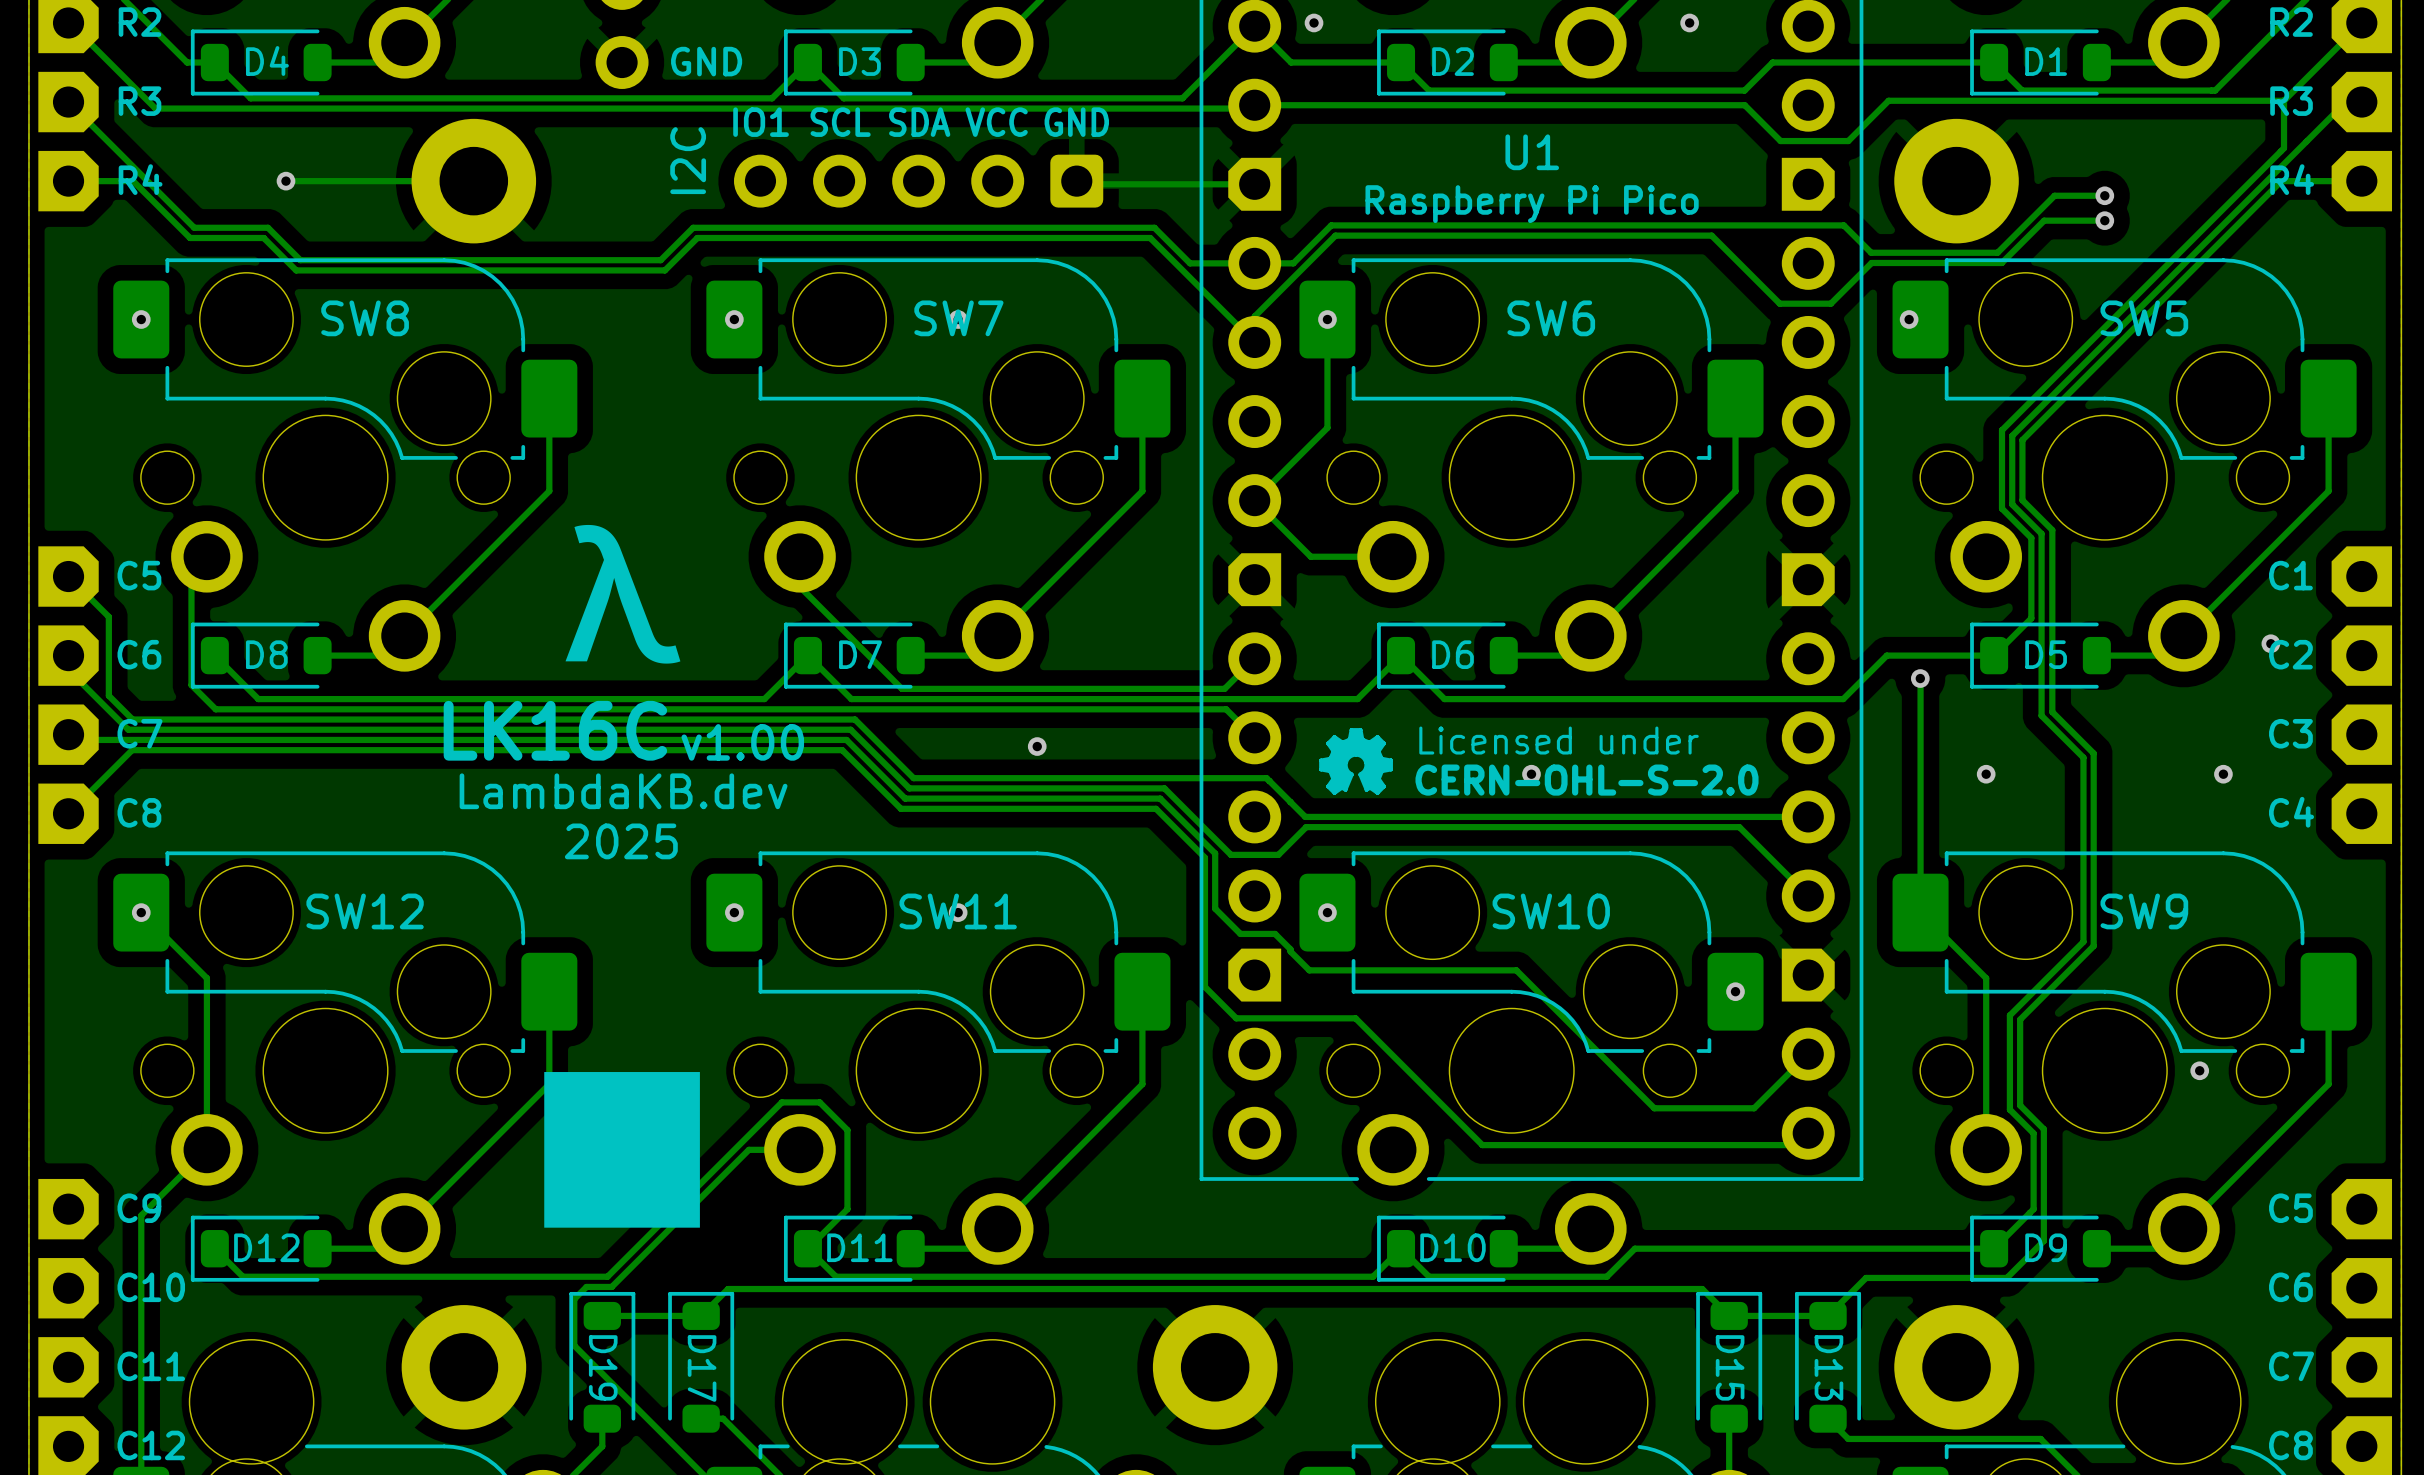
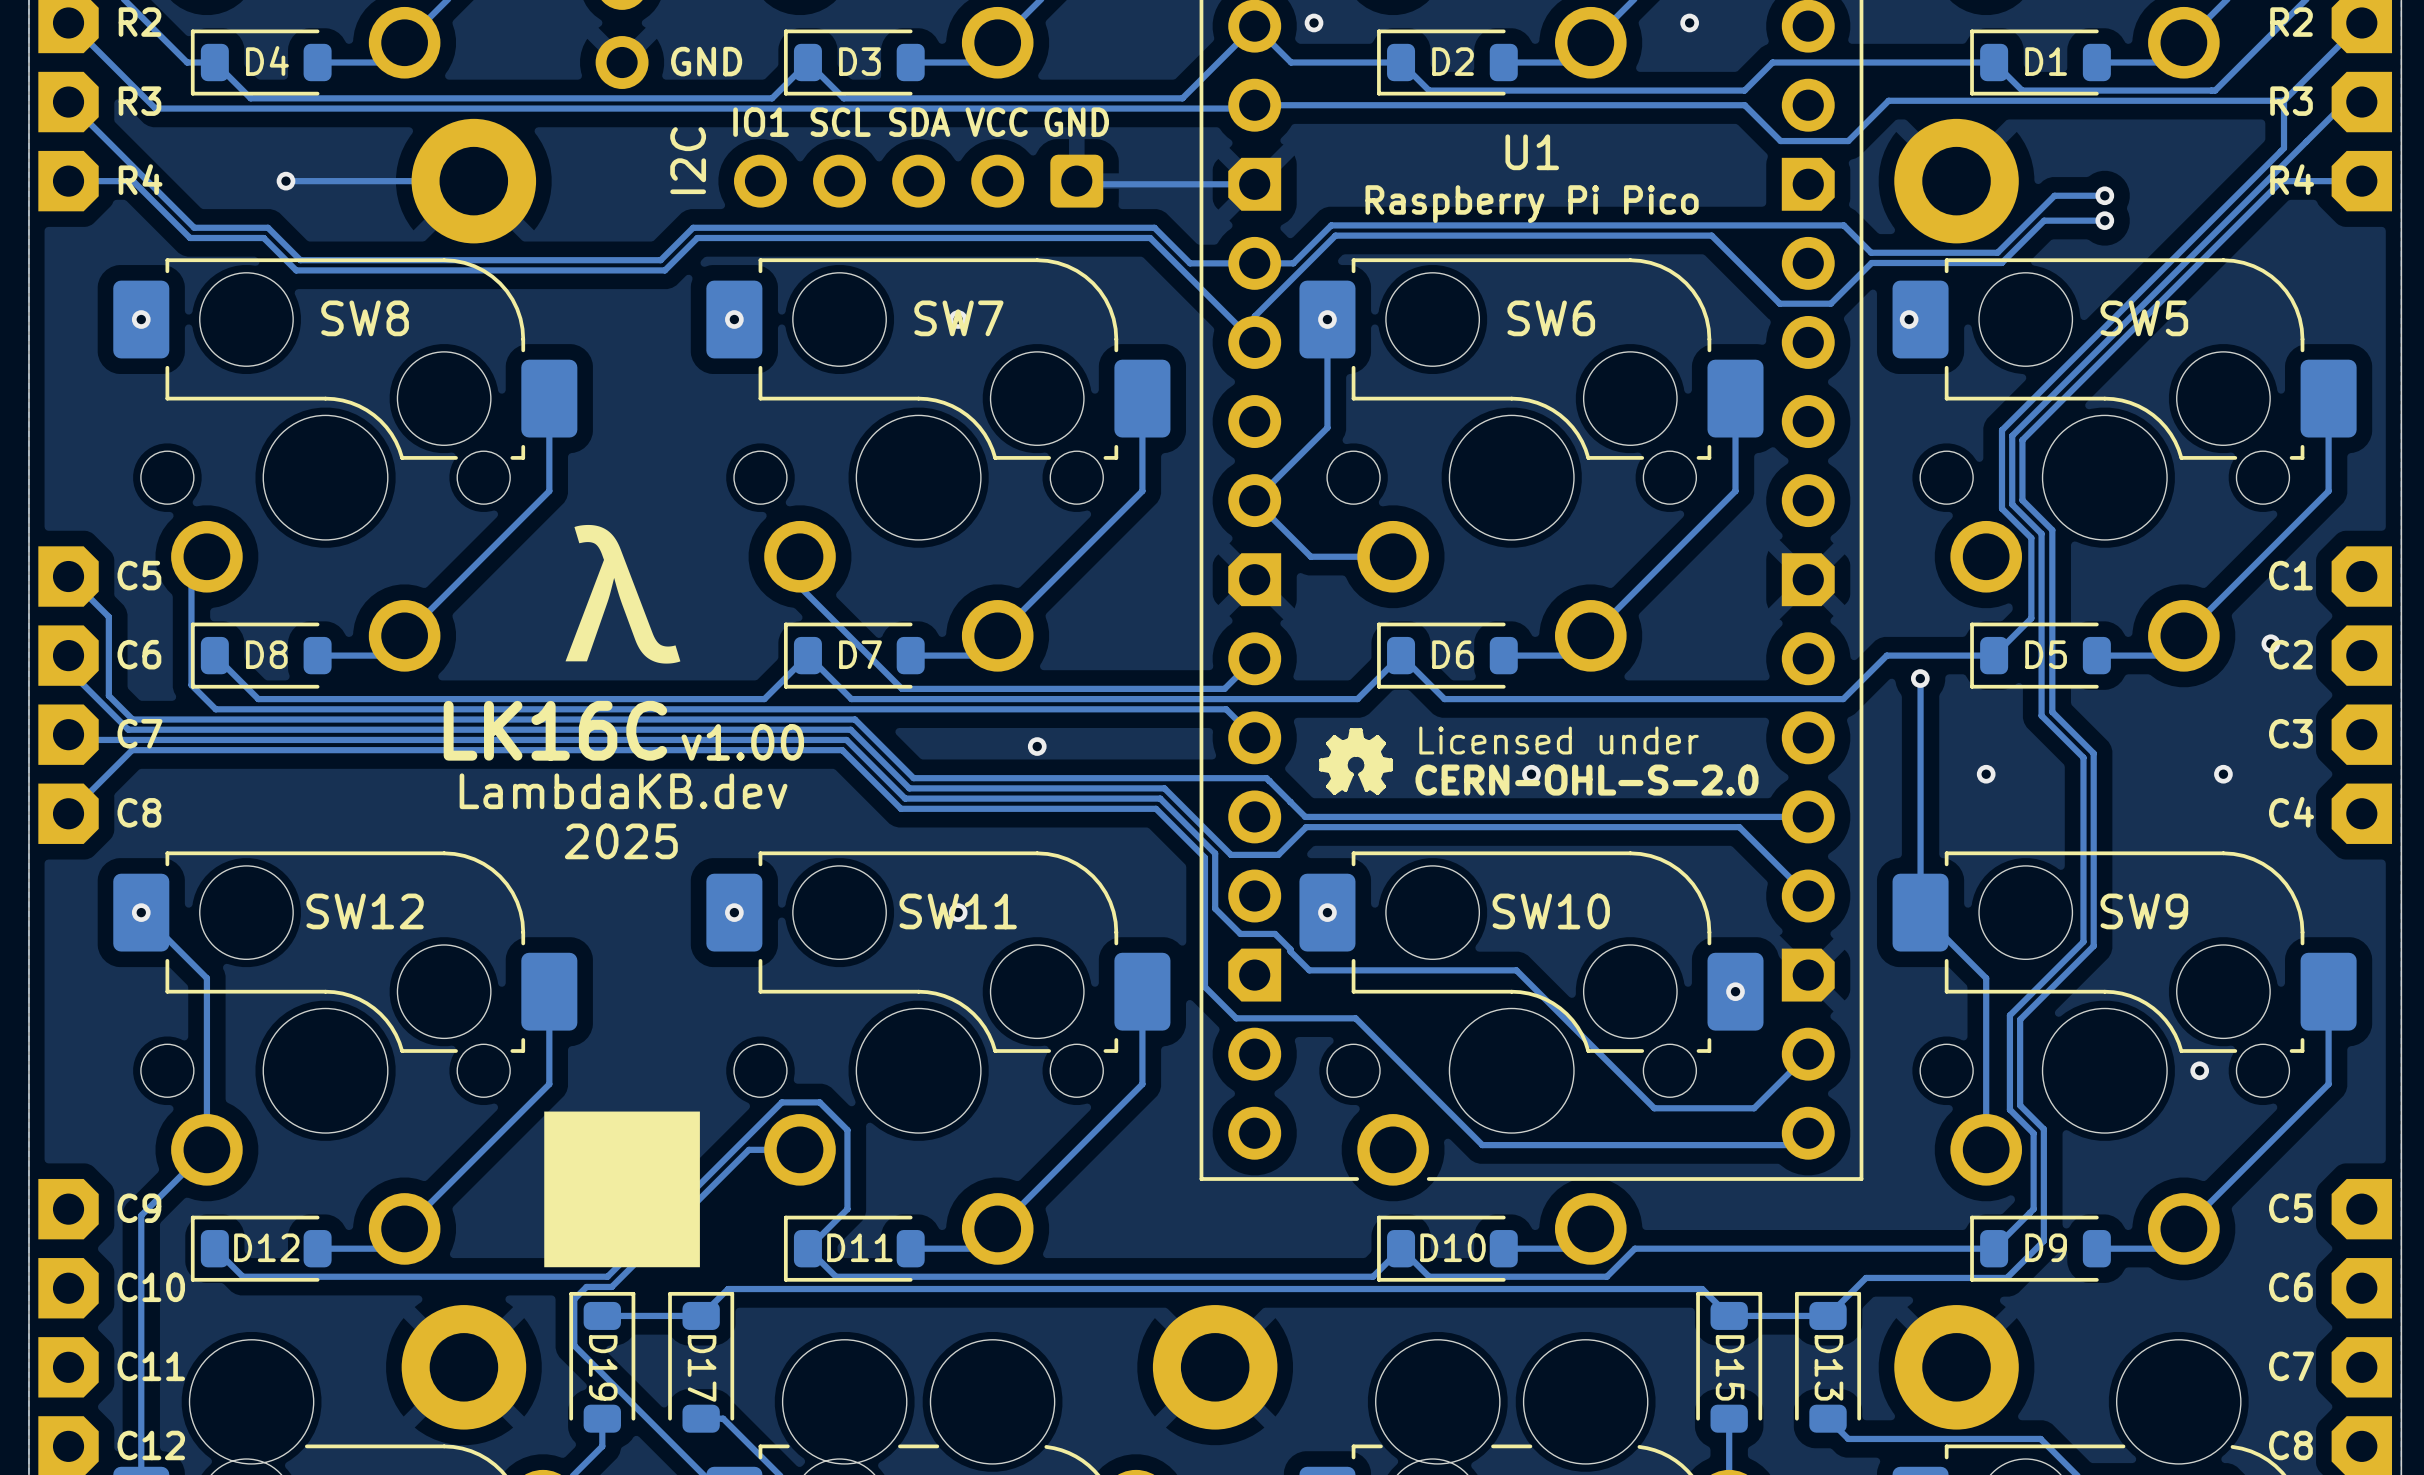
drawing position: (622, 1149) -> (622, 1189)

